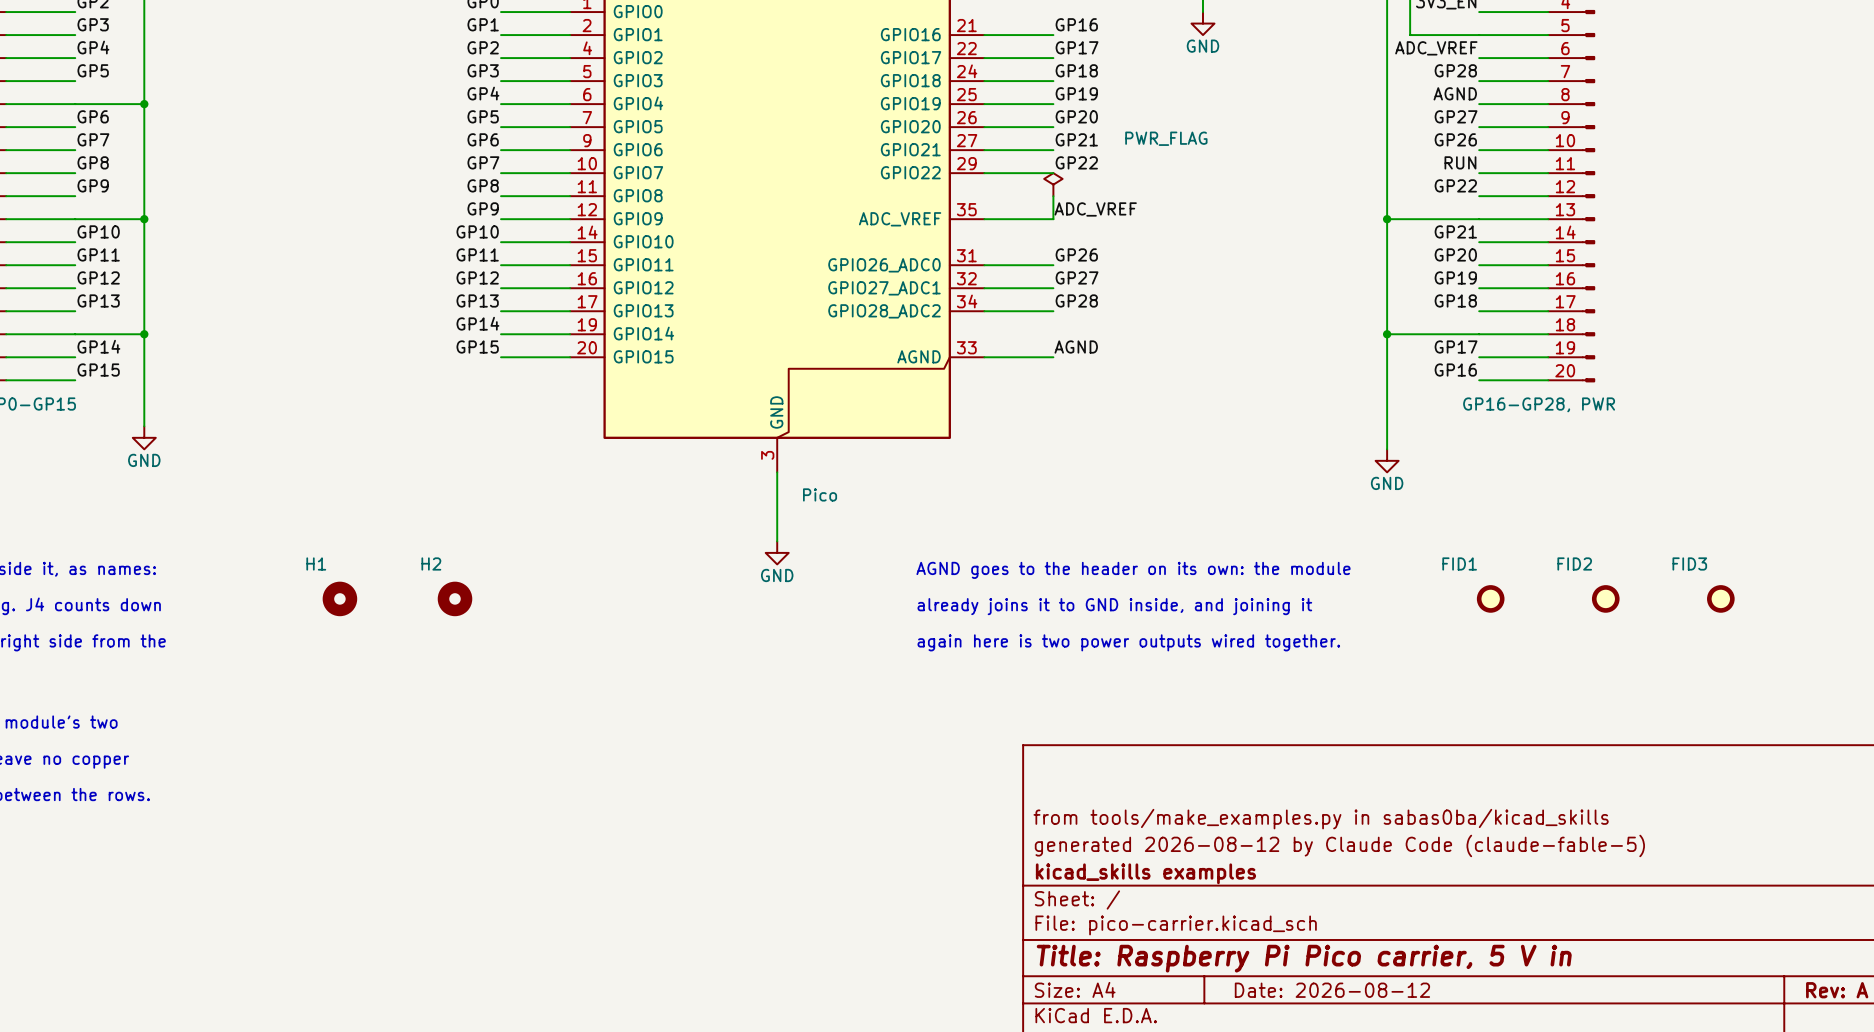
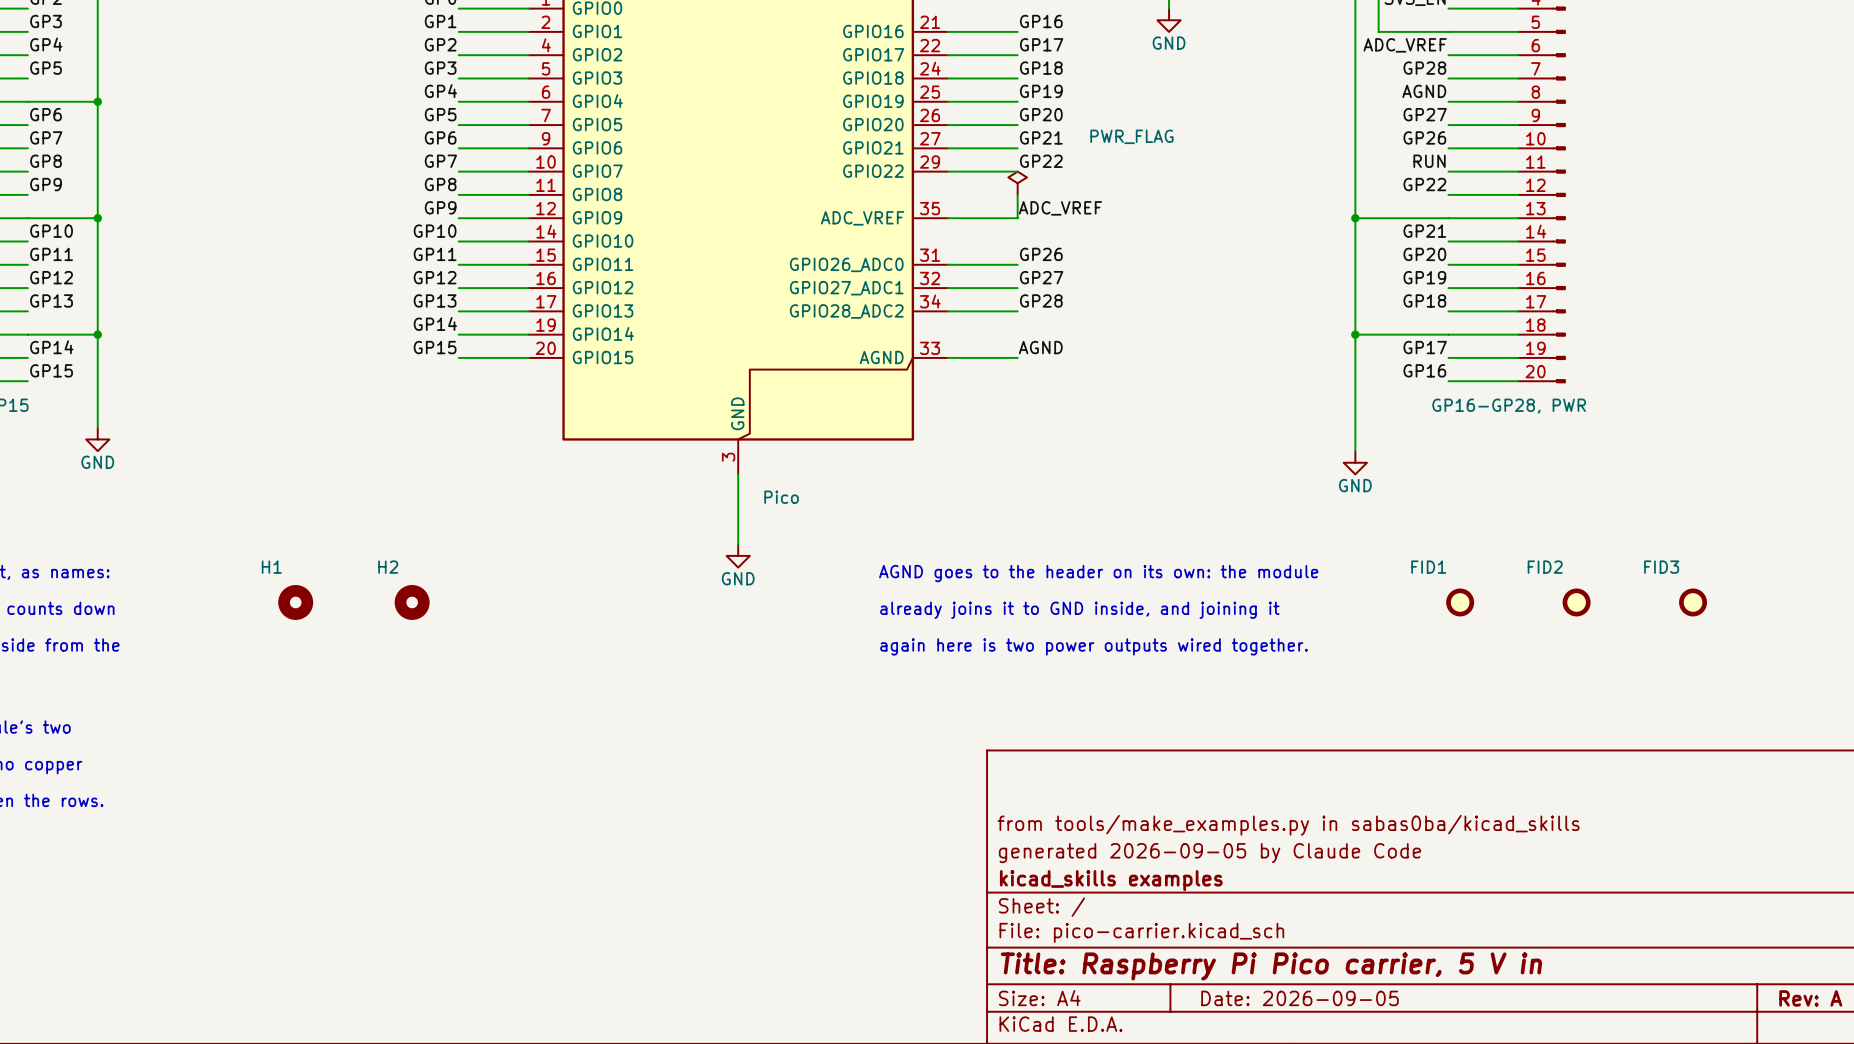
title block: generated 2026-08-12 by Claude Code (claude-fable-5) (1339, 845) -> generated 2026-09-05 by Claude Code (1209, 853)
title block: Date: 2026-08-12 (1332, 990) -> Date: 2026-09-05 (1300, 998)

